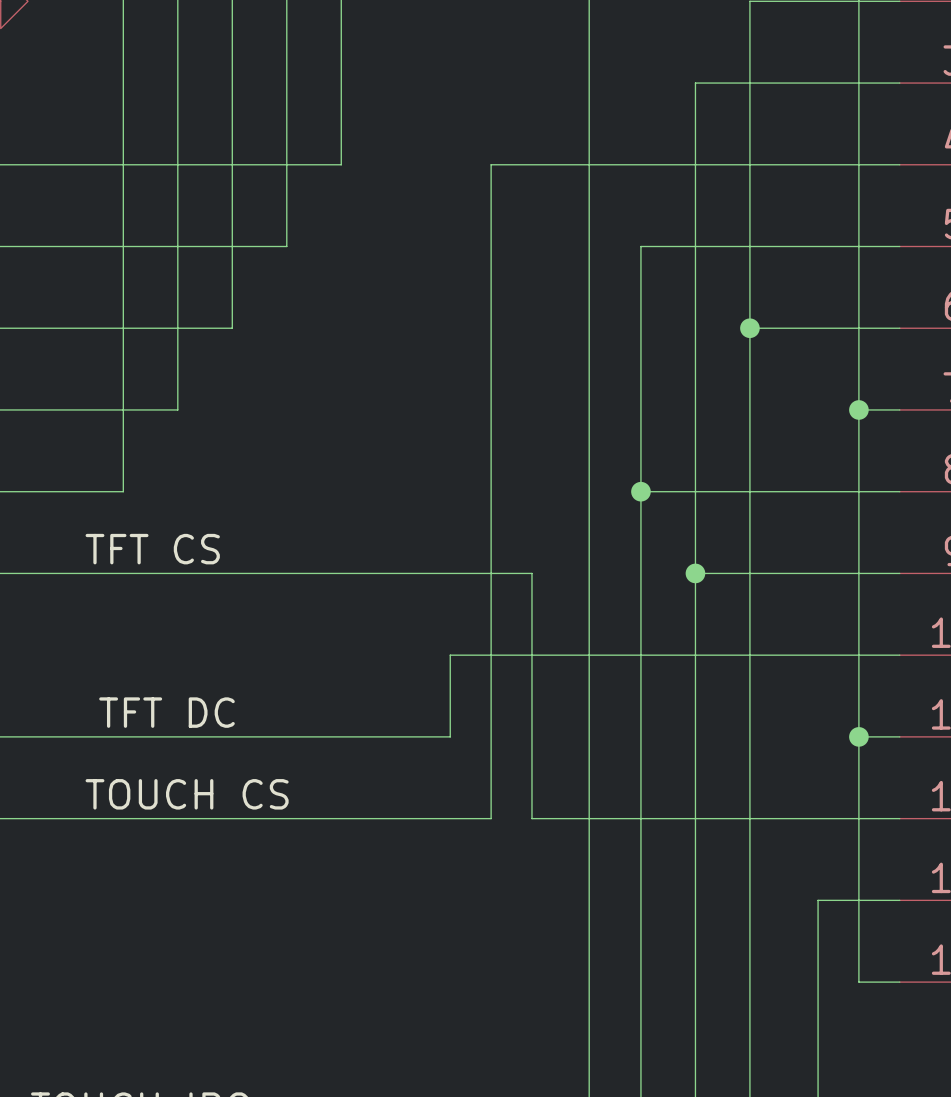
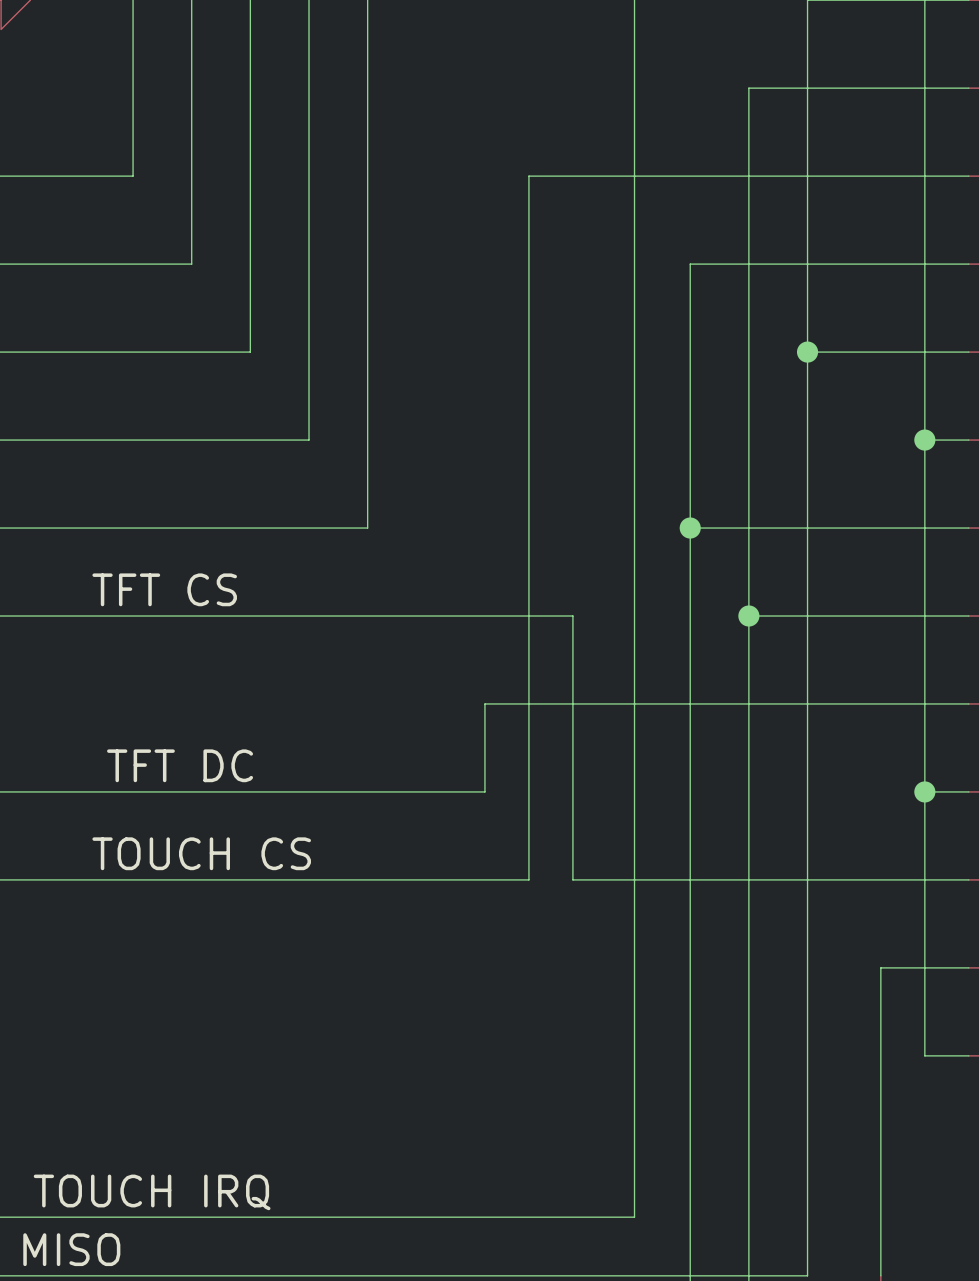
wire: (341, 164) (123, 164) (123, 491) -> (367, 176) (367, 528) (133, 528)
wire: (286, 246) (177, 246) (177, 409) -> (309, 264) (309, 440) (191, 440)

